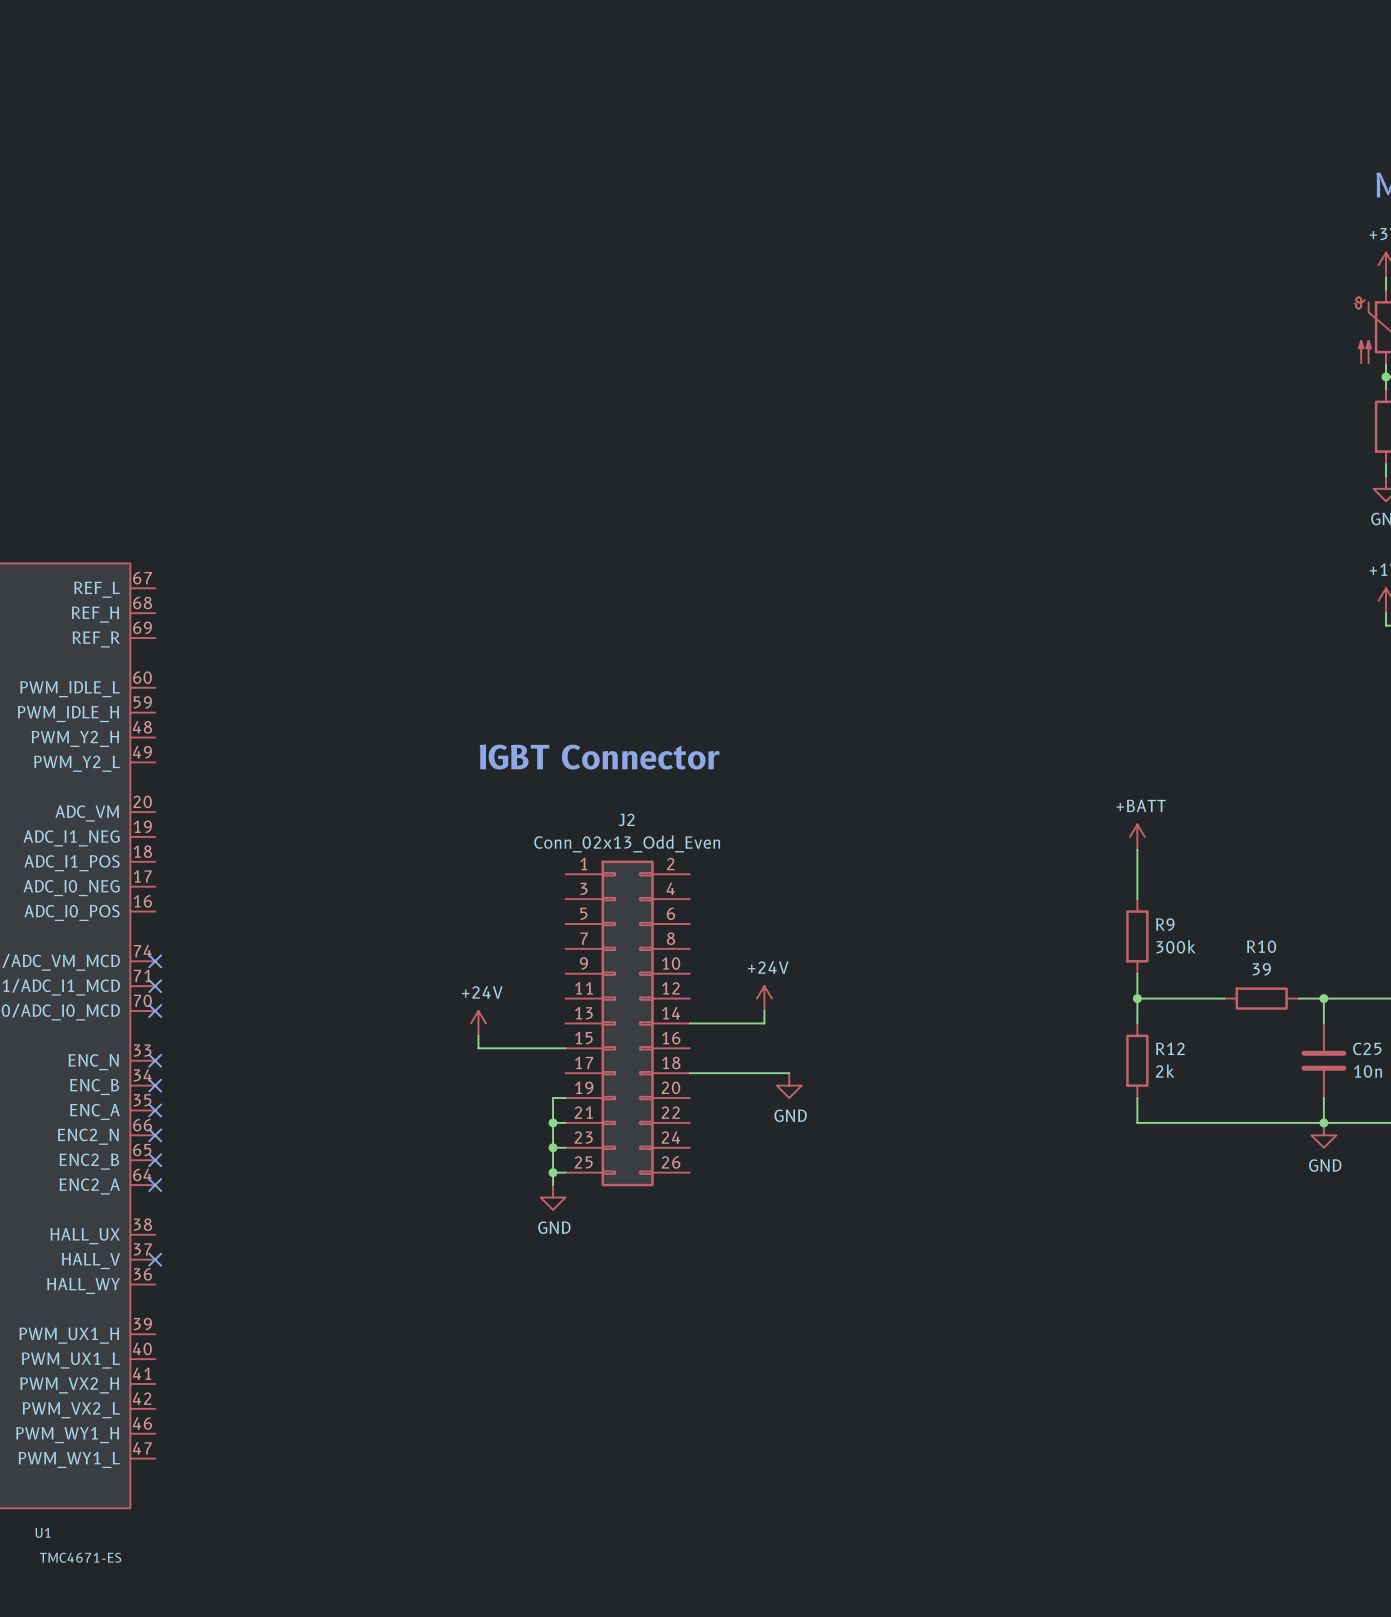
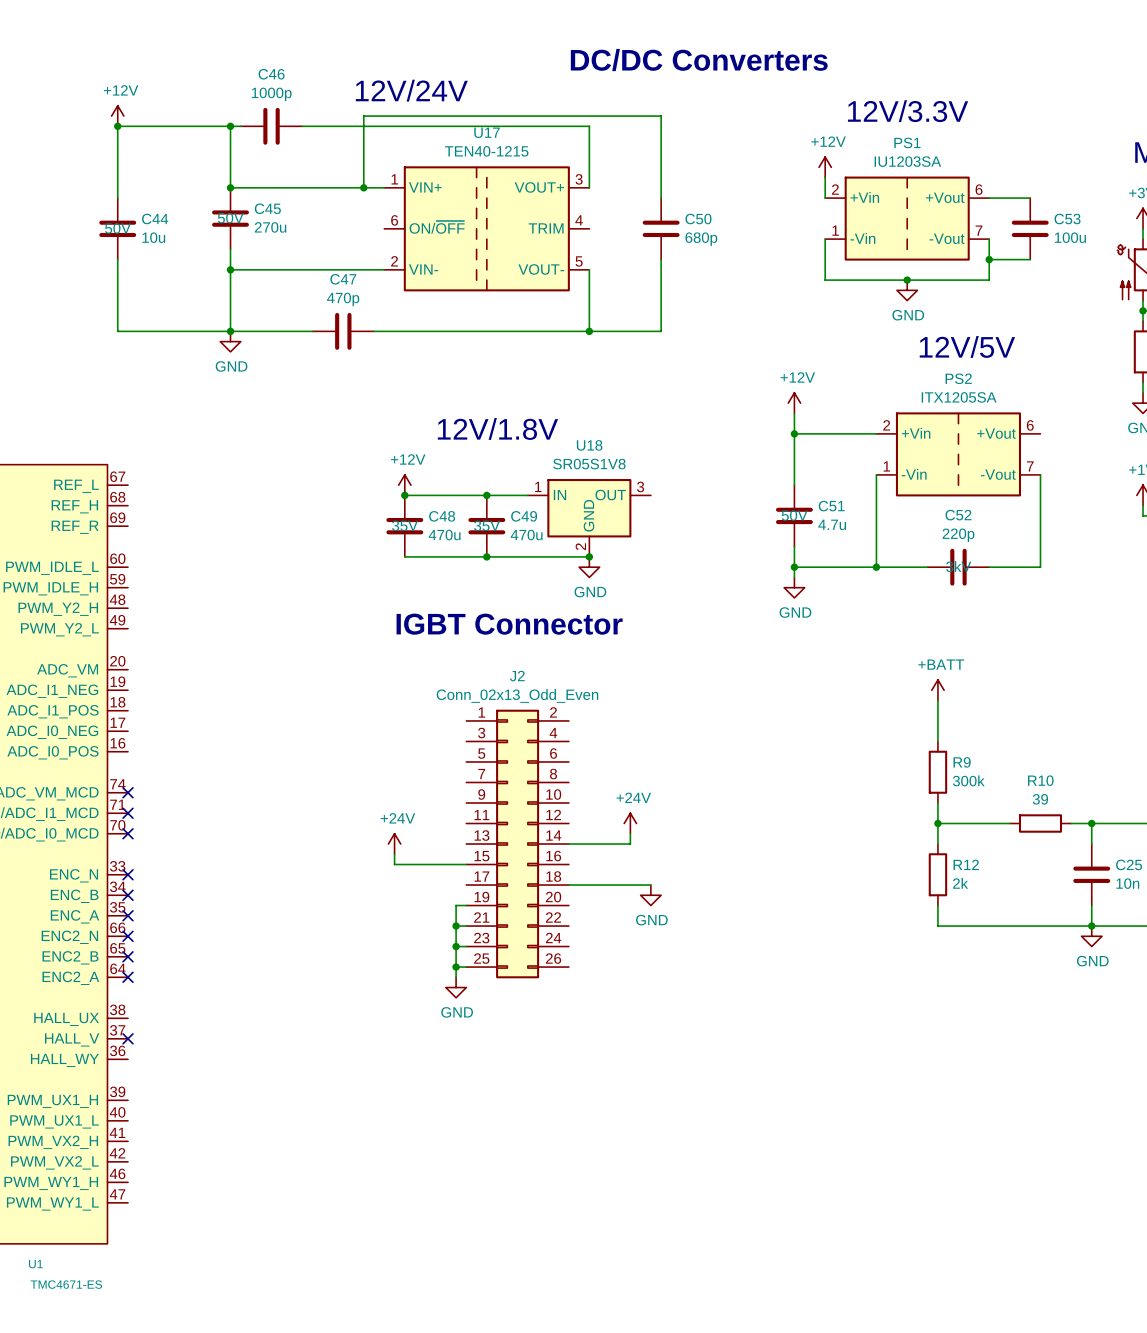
text: none -> DC/DC Converters (699, 60)
text: none -> 12V/24V (411, 90)
text: none -> 12V/3.3V (908, 111)
power symbol: none -> +12V (117, 116)
junction: none -> (117, 126)
wire: none -> (230, 126) (230, 187) (384, 187)
junction: none -> (230, 126)
wire: none -> (240, 126) (117, 126) (117, 198)
C46: none -> 1000p (271, 126)
wire: none -> (302, 126) (589, 126) (589, 187)
power symbol: none -> +12V (825, 167)
wire: none -> (825, 177) (825, 198)
junction: none -> (230, 187)
wire: none -> (363, 187) (363, 116) (661, 116) (661, 198)
junction: none -> (363, 187)
wire: none -> (989, 198) (1030, 198)
C45: none -> 270u (230, 218)
PS1: none -> IU1203SA (907, 218)
C44: none -> 10u (117, 228)
U17: none -> TEN40-1215 (486, 228)
C50: none -> 680p (661, 228)
C53: none -> 100u (1030, 228)
wire: none -> (825, 239) (825, 280) (989, 280) (989, 239)
wire: none -> (230, 249) (230, 331)
wire: none -> (117, 259) (117, 331) (312, 331)
wire: none -> (661, 259) (661, 331) (374, 331)
wire: none -> (989, 259) (1030, 259)
junction: none -> (989, 259)
wire: none -> (230, 269) (384, 269)
junction: none -> (230, 269)
wire: none -> (589, 269) (589, 331)
junction: none -> (907, 280)
power symbol: none -> GND (907, 290)
junction: none -> (230, 331)
C47: none -> 470p (343, 331)
junction: none -> (589, 331)
power symbol: none -> GND (230, 341)
text: none -> 12V/5V (967, 346)
power symbol: none -> +12V (794, 403)
wire: none -> (794, 413) (794, 485)
text: none -> 12V/1.8V (497, 428)
wire: none -> (794, 433) (876, 433)
junction: none -> (794, 433)
PS2: none -> ITX1205SA (958, 454)
wire: none -> (876, 474) (876, 567)
wire: none -> (1040, 474) (1040, 567) (989, 567)
power symbol: none -> +12V (404, 485)
wire: none -> (404, 495) (527, 495)
junction: none -> (404, 495)
junction: none -> (486, 495)
C51: none -> 4.7u (794, 515)
U18: none -> SR05S1V8 (589, 517)
C48: none -> 470u (404, 526)
C49: none -> 470u (486, 526)
wire: none -> (794, 546) (794, 577)
wire: none -> (404, 556) (589, 556)
junction: none -> (486, 556)
junction: none -> (589, 556)
power symbol: none -> GND (589, 567)
wire: none -> (794, 567) (927, 567)
junction: none -> (794, 567)
junction: none -> (876, 567)
C52: none -> 220p (958, 567)
power symbol: none -> GND (794, 587)

